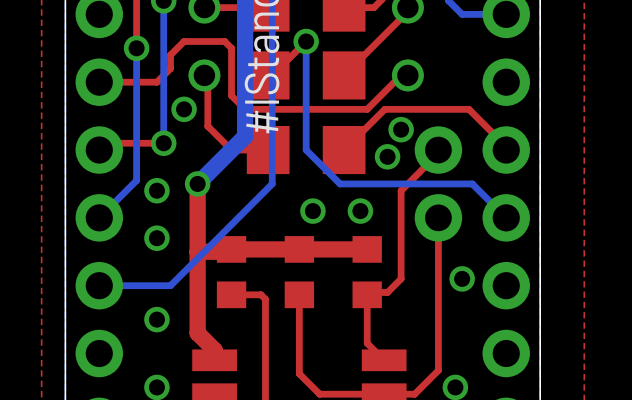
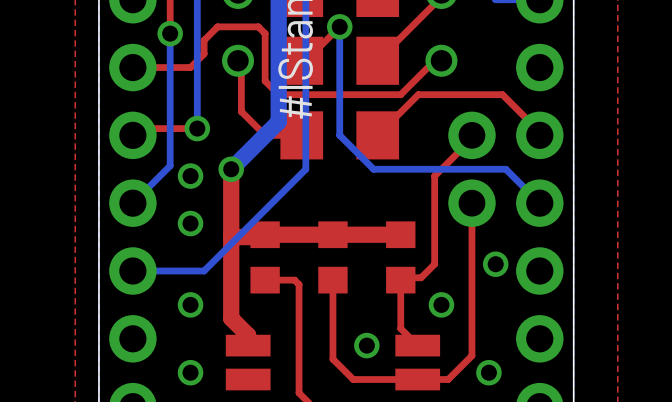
via: (184, 109) -> none
via: (401, 129) -> none
via: (387, 156) -> none
via: (312, 211) -> none
via: (360, 211) -> none
via: none -> (441, 304)
via: none -> (366, 345)

